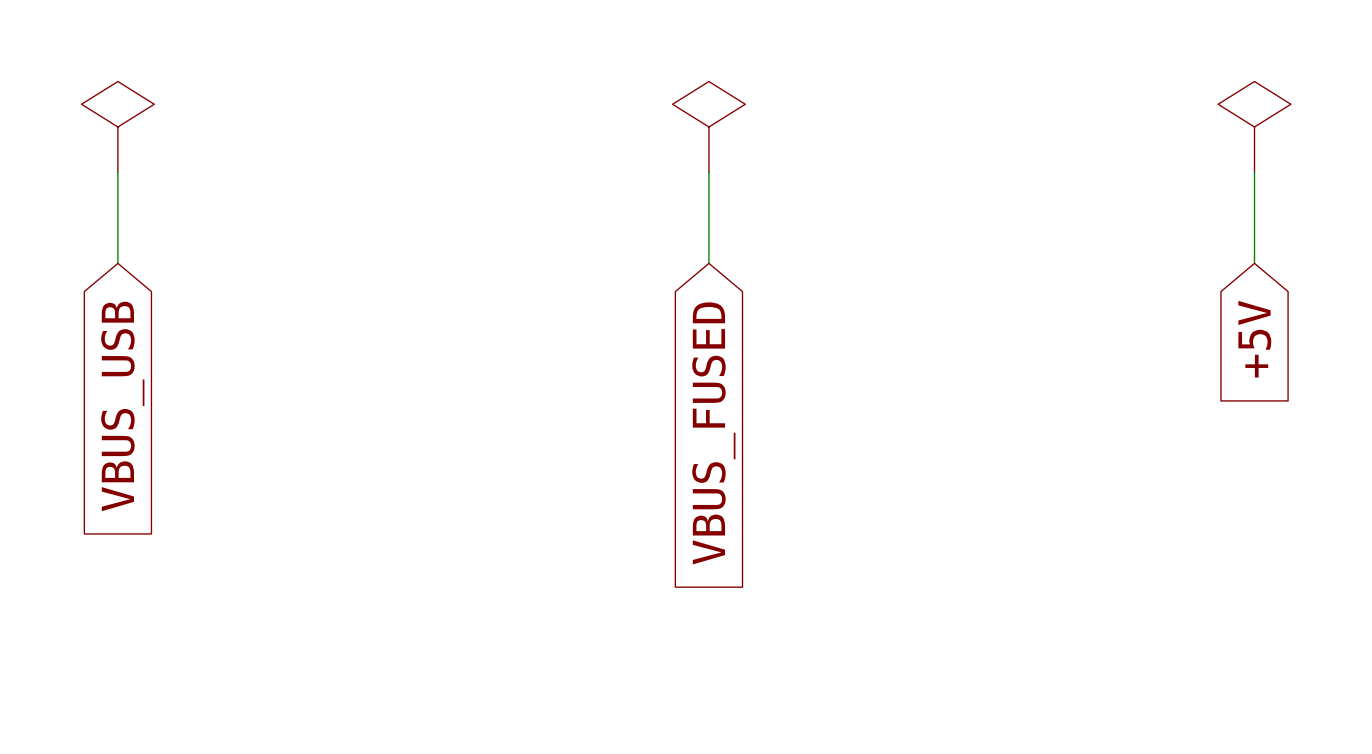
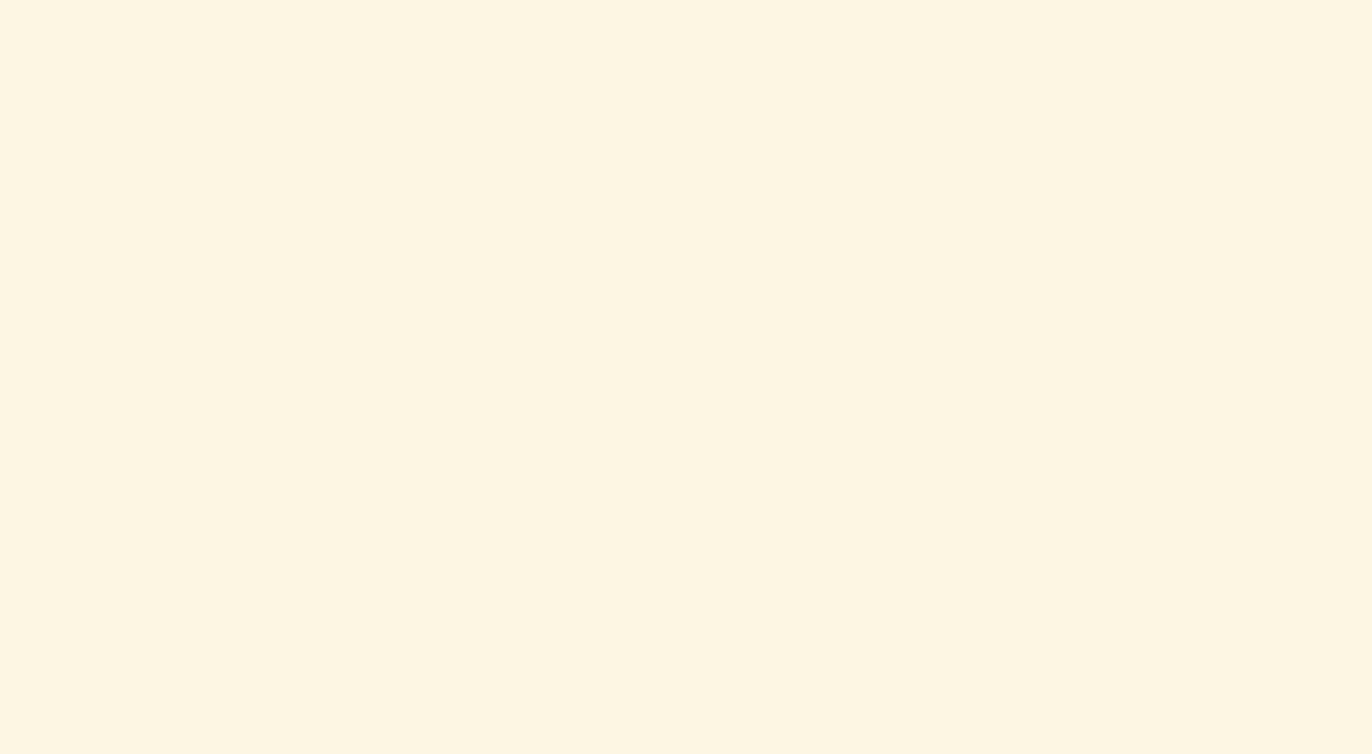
power symbol: (117, 126) -> none
power symbol: (708, 126) -> none
power symbol: (1254, 126) -> none
wire: (117, 172) (117, 263) -> none
wire: (708, 172) (708, 263) -> none
wire: (1254, 172) (1254, 263) -> none
global label: +5V (1254, 339) -> none
global label: VBUS_USB (122, 406) -> none
global label: VBUS_FUSED (713, 433) -> none

